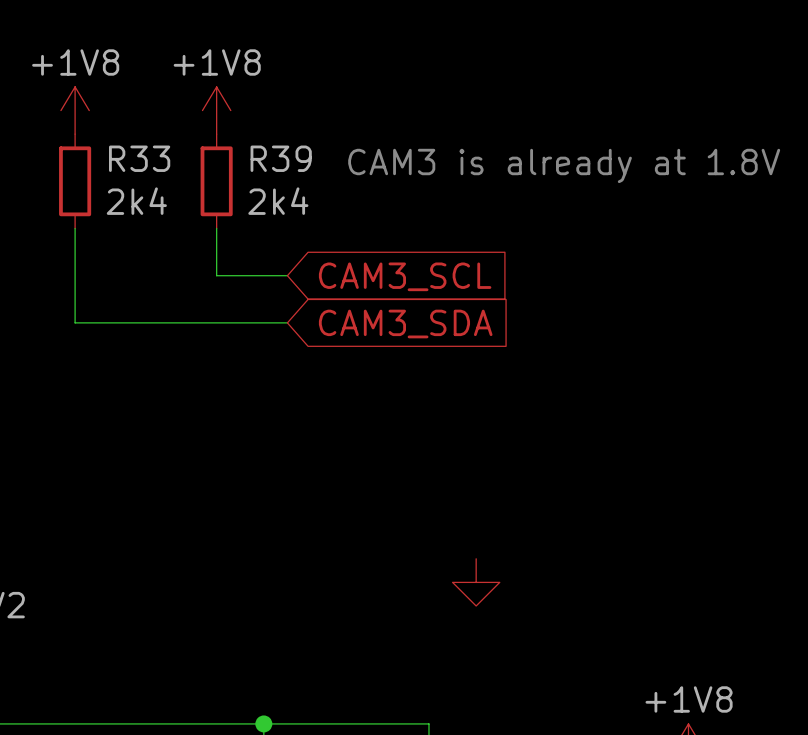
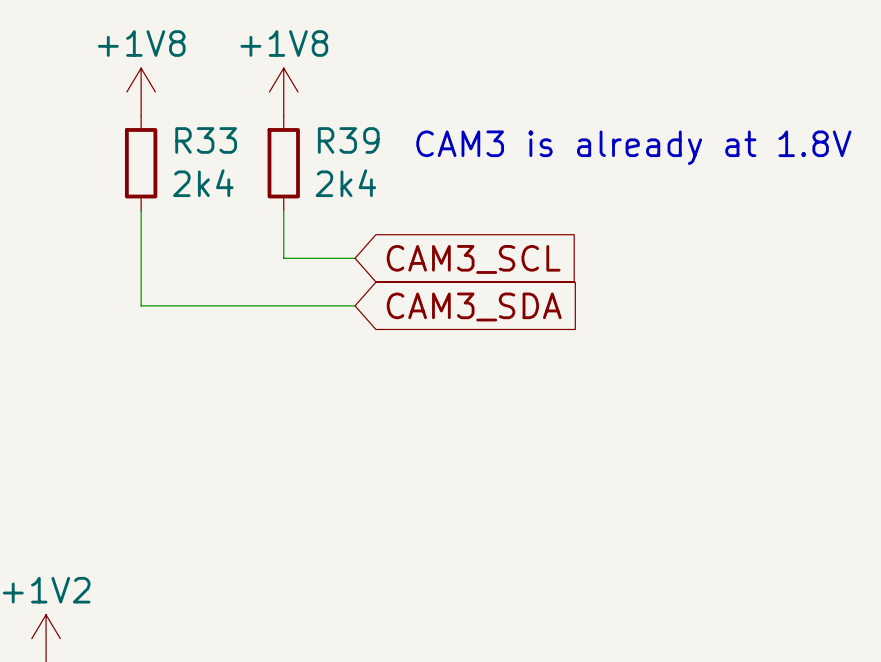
power symbol: (476, 582) -> none

